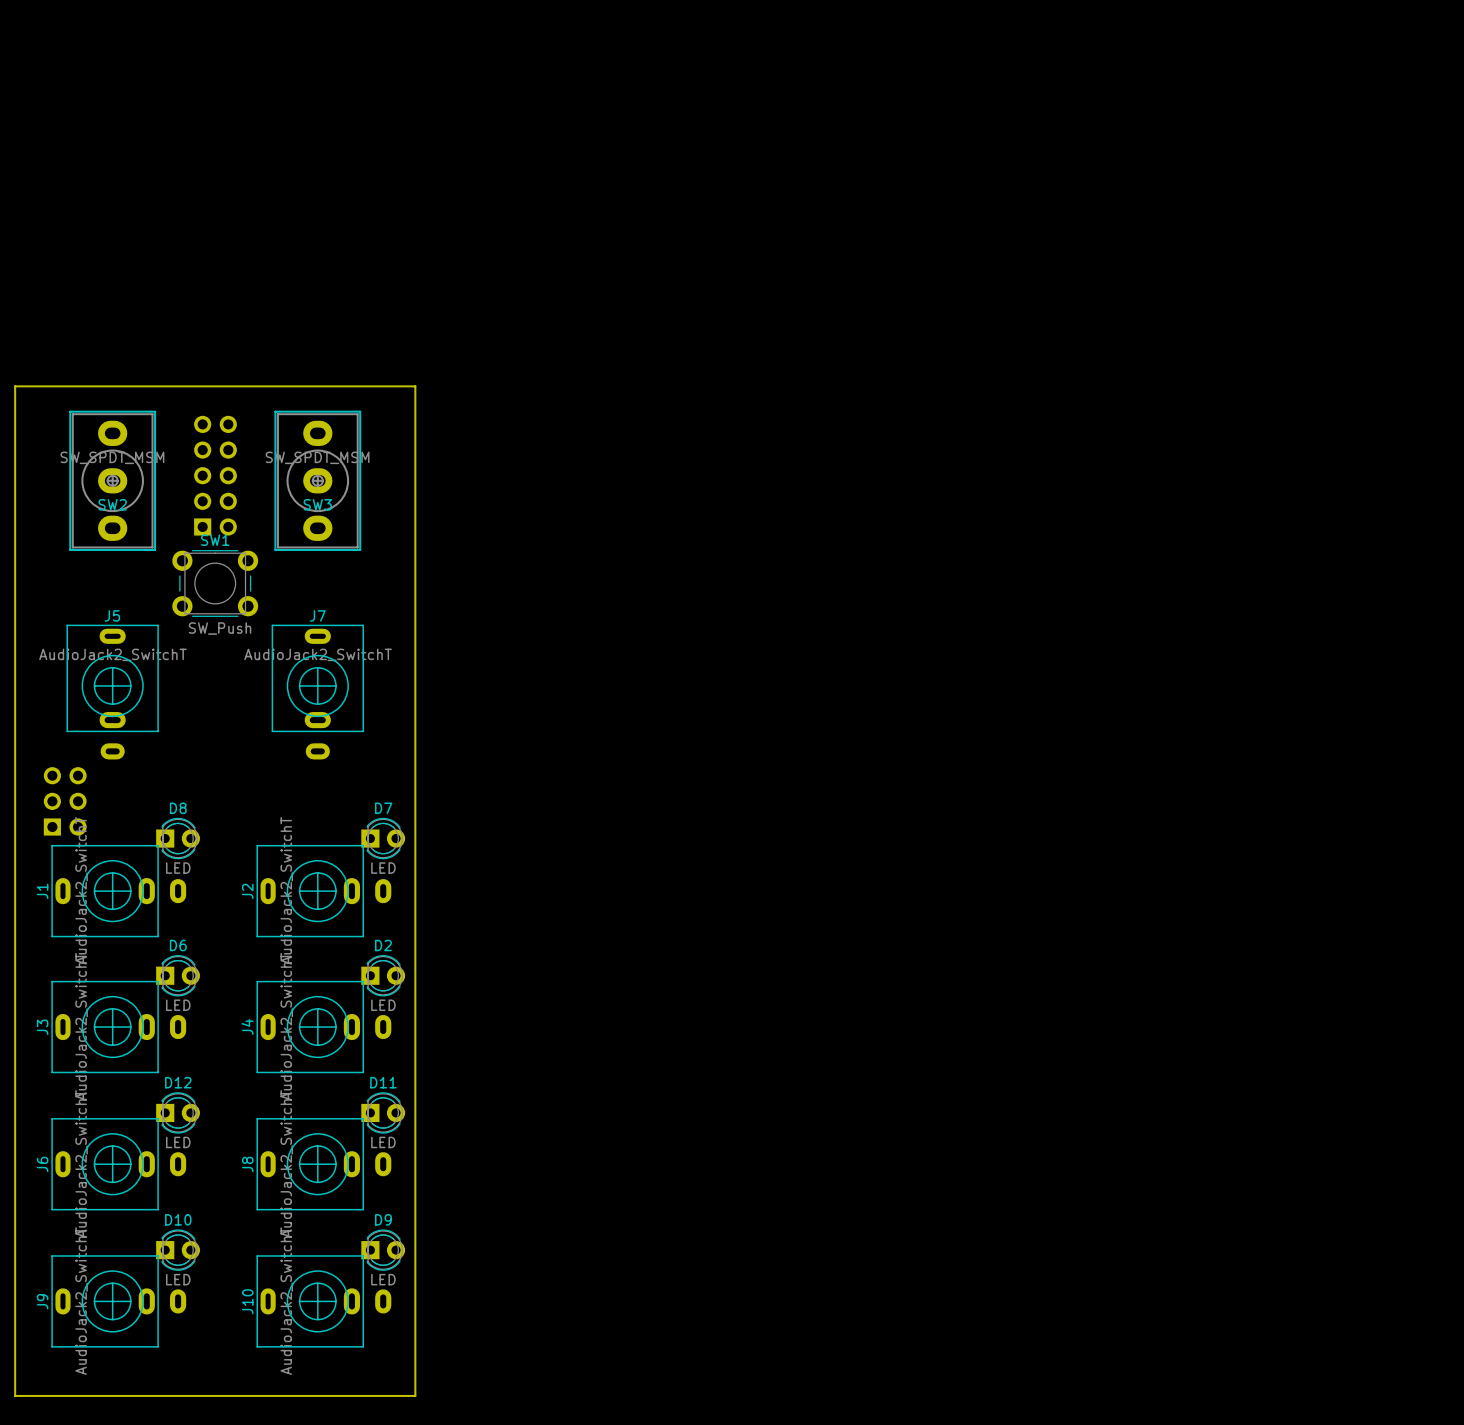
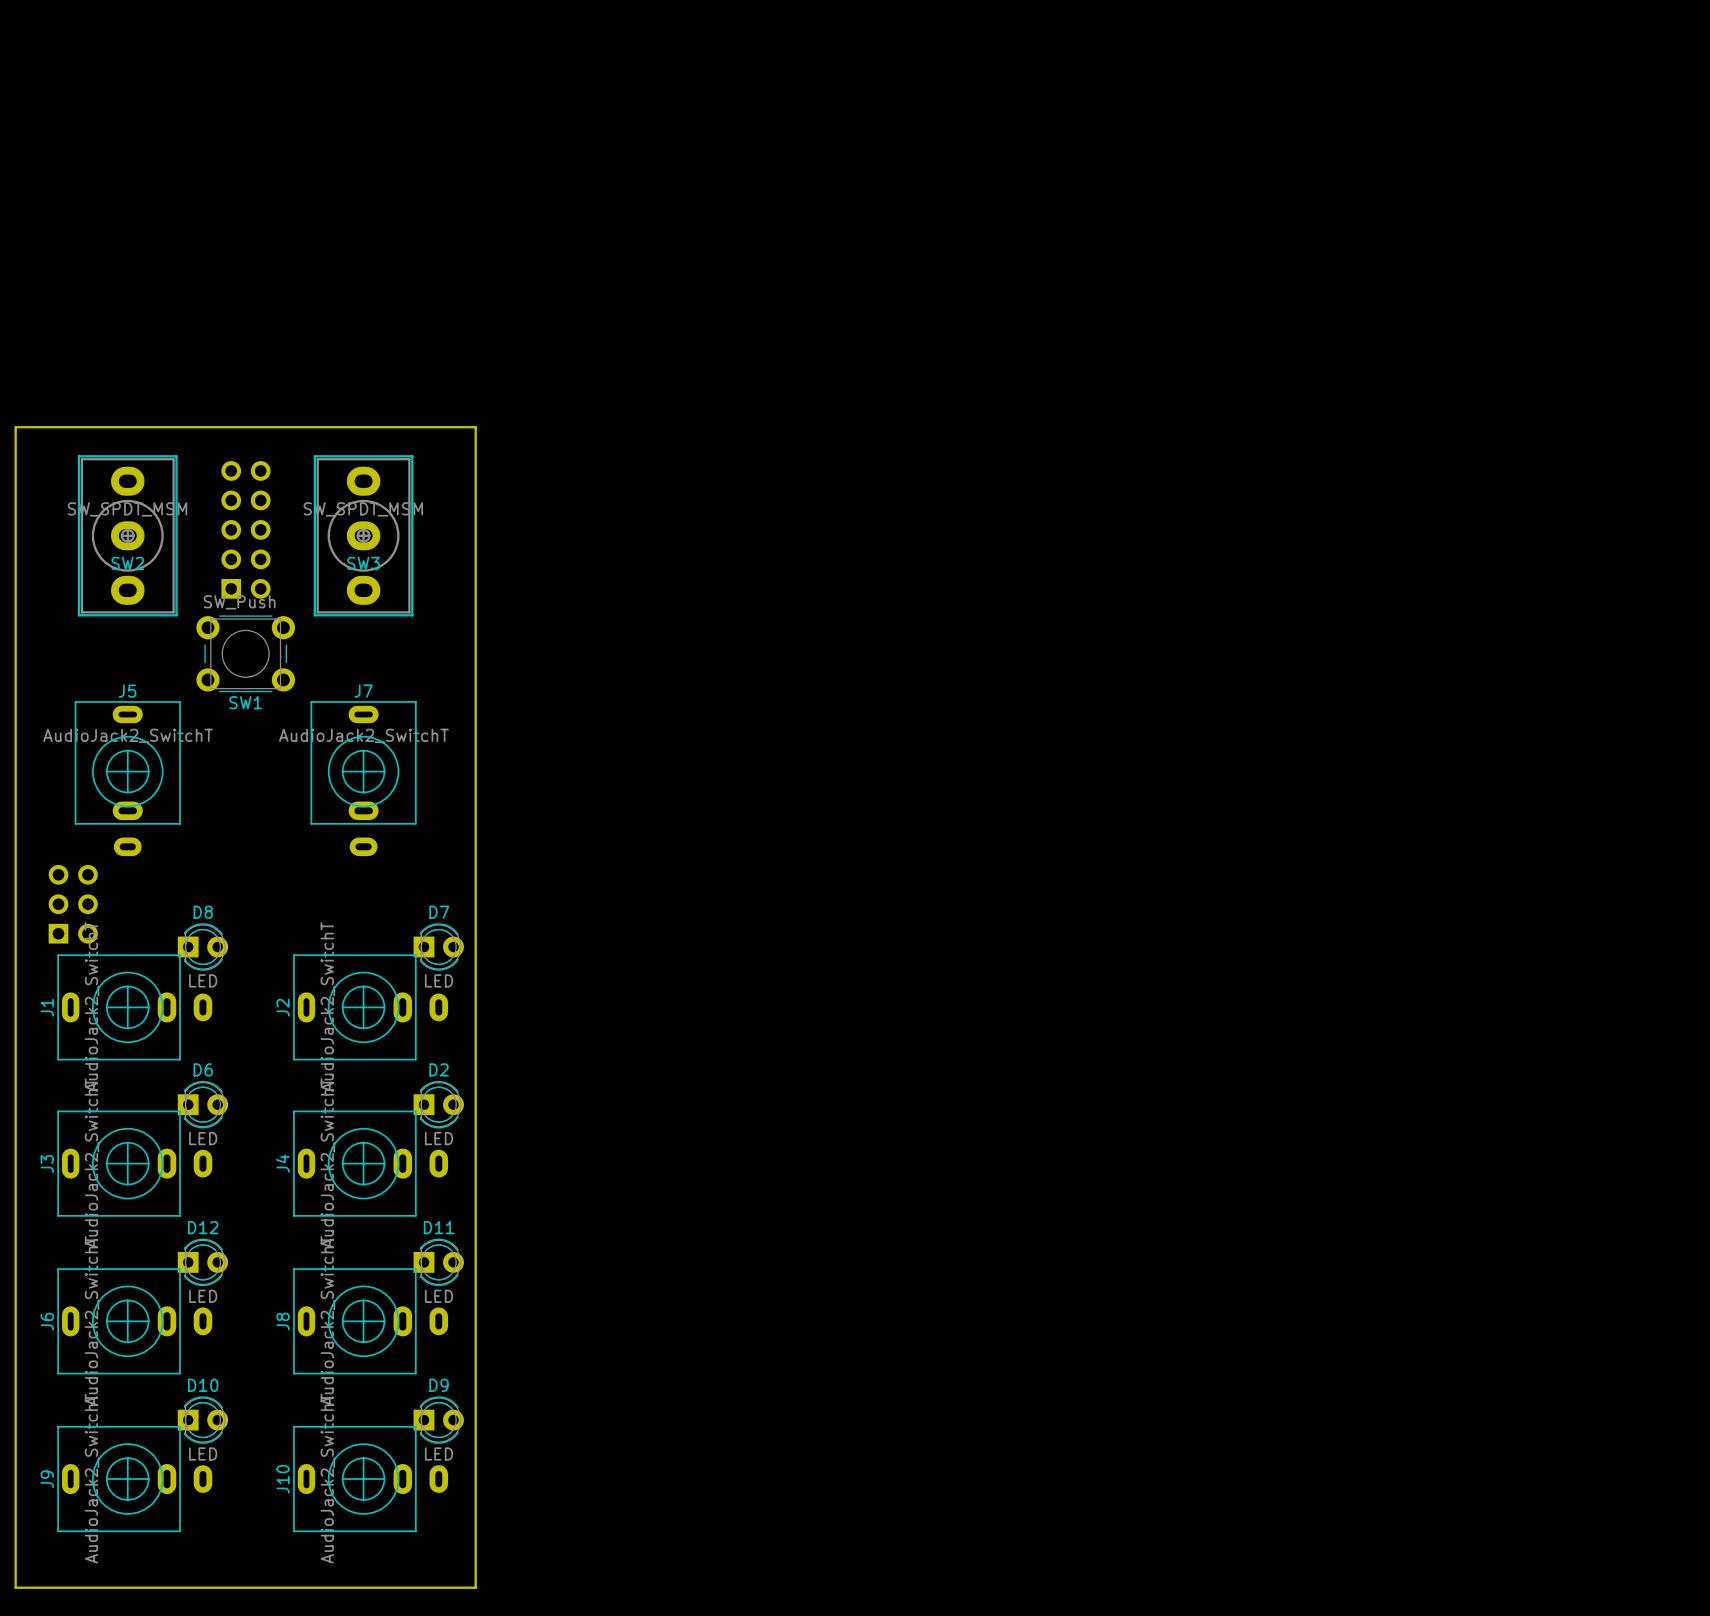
SW1 rotation: 0° (215, 583) -> 180° (245, 653)

